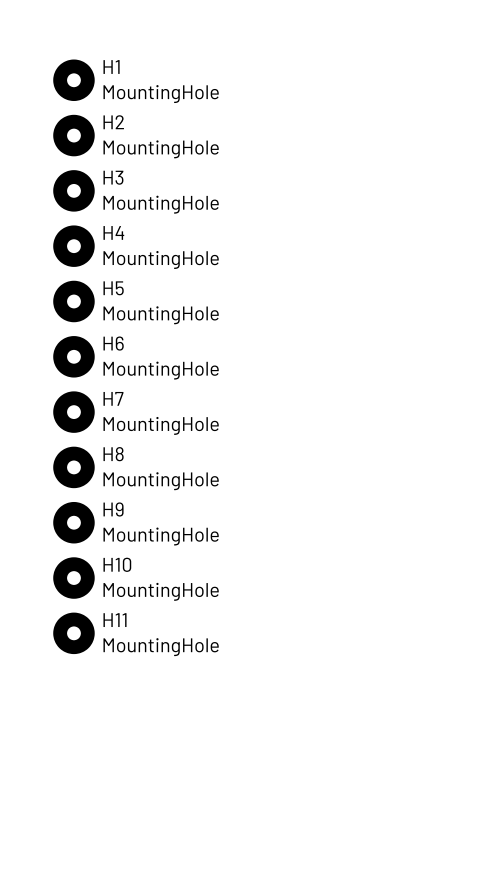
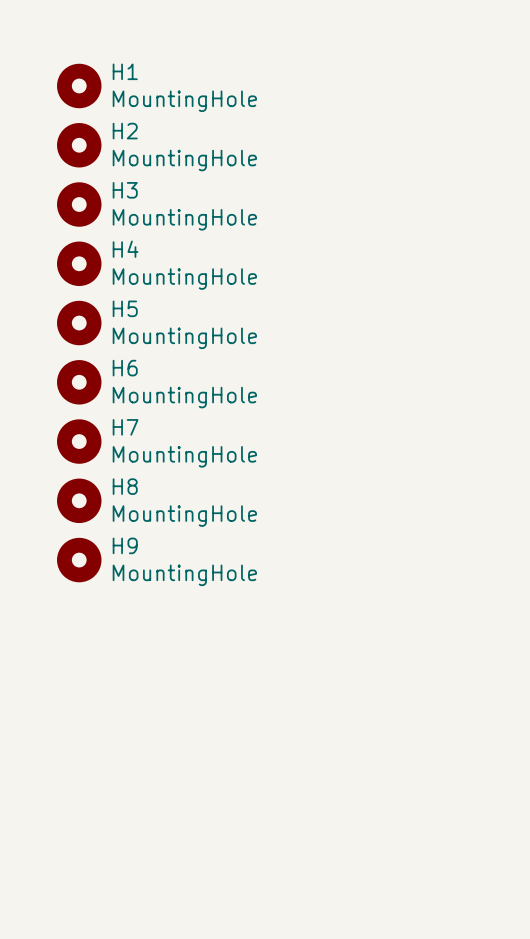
H10: MountingHole (73, 578) -> none
H11: MountingHole (73, 633) -> none

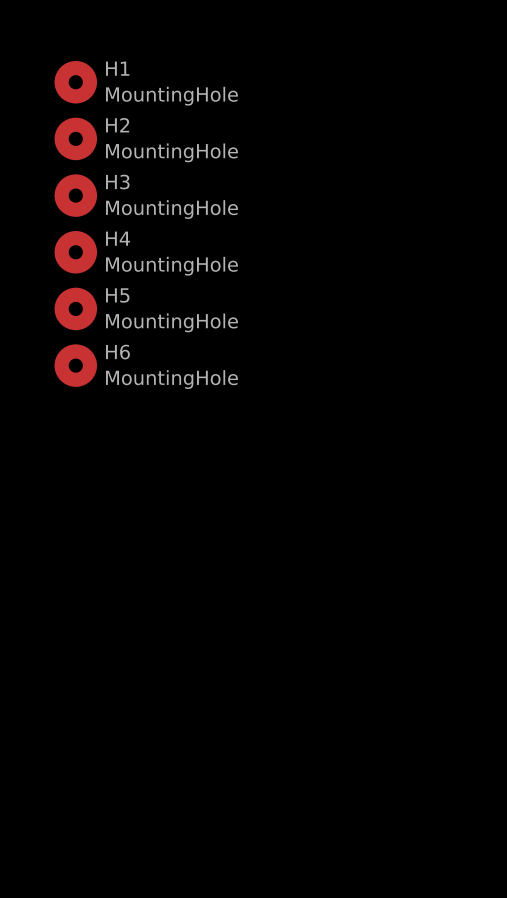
H7: MountingHole (79, 441) -> none
H8: MountingHole (79, 500) -> none
H9: MountingHole (79, 560) -> none

